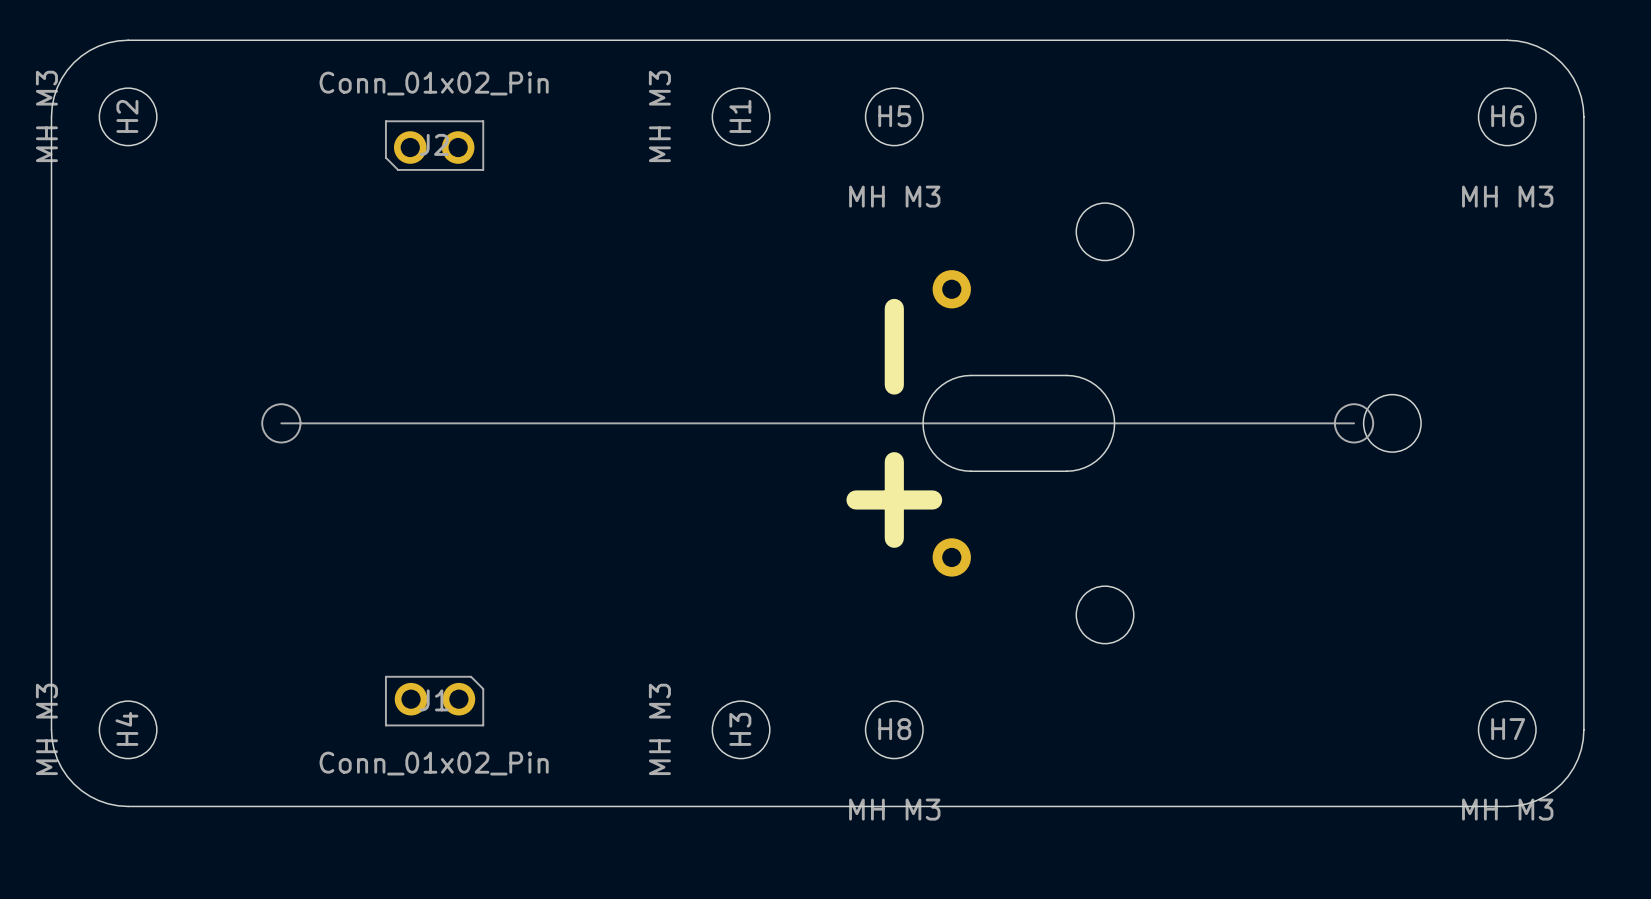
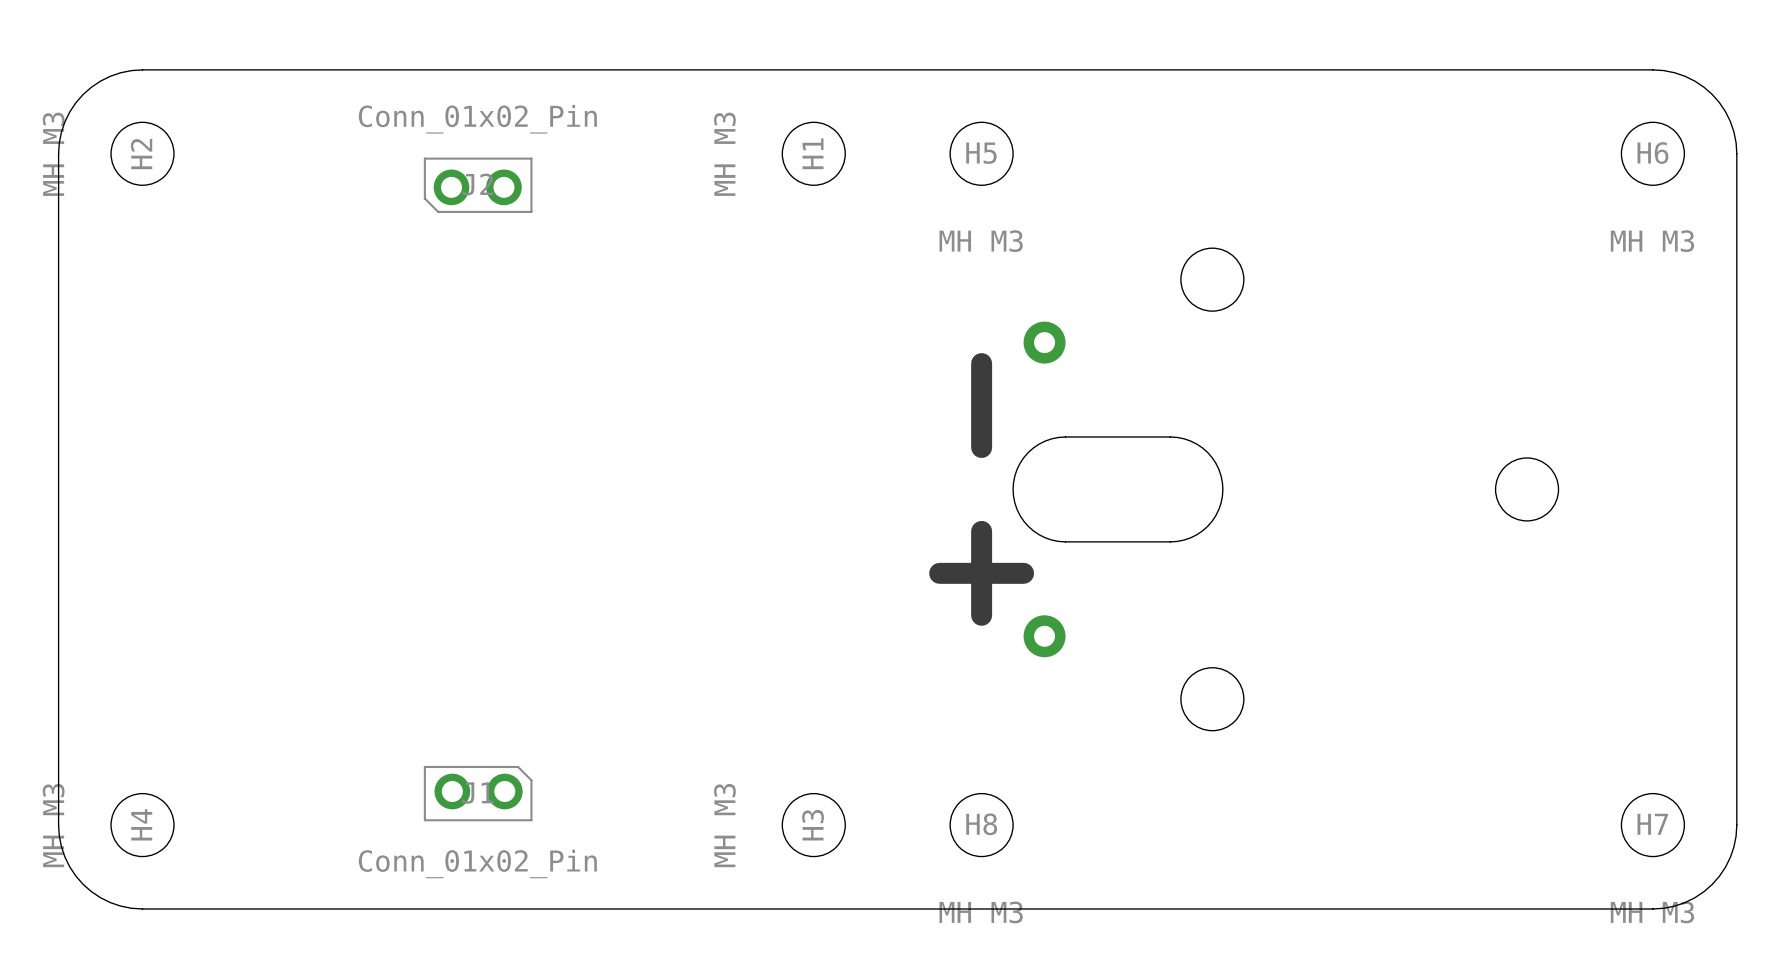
drawing: [261, 403, 302, 444] -> none
drawing: [1333, 403, 1375, 444] -> none
line: (281, 423) (1354, 423) -> none

